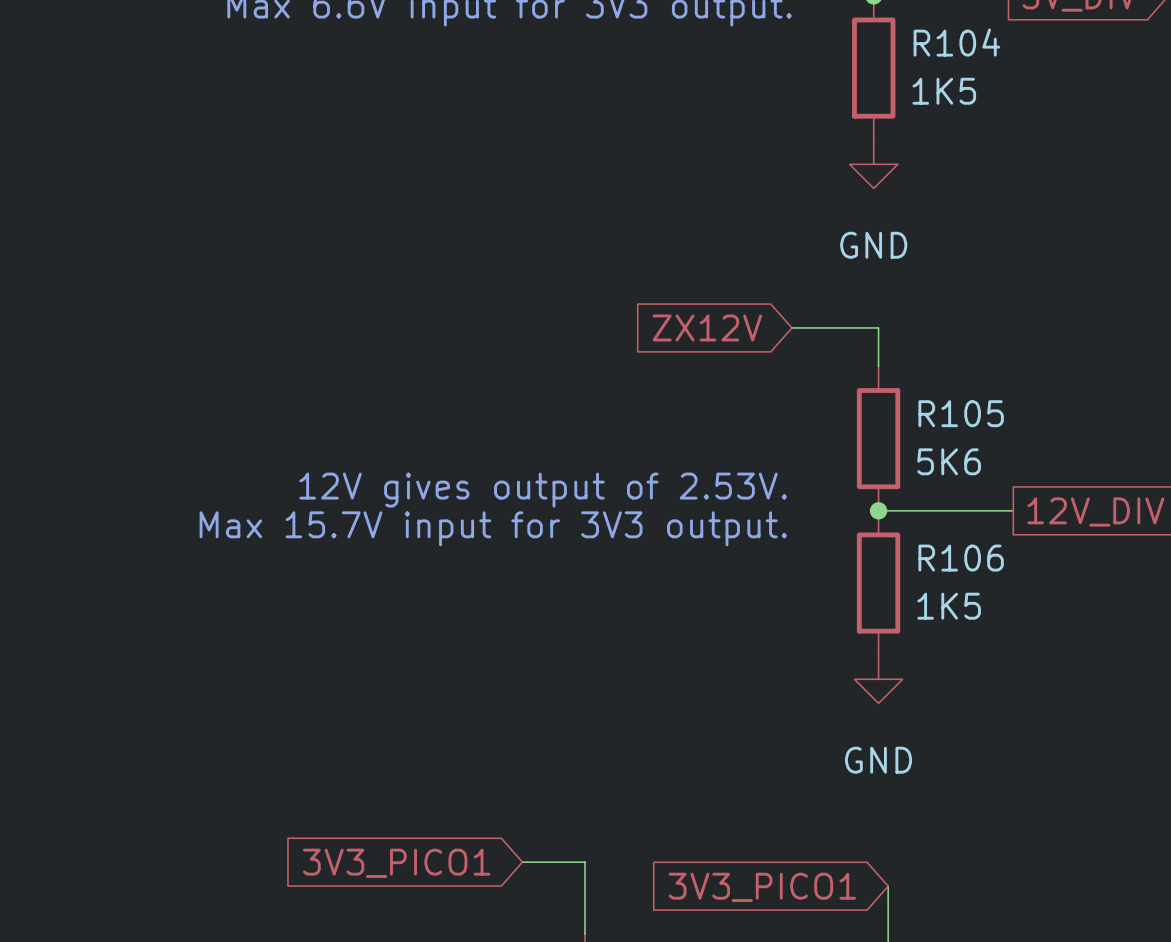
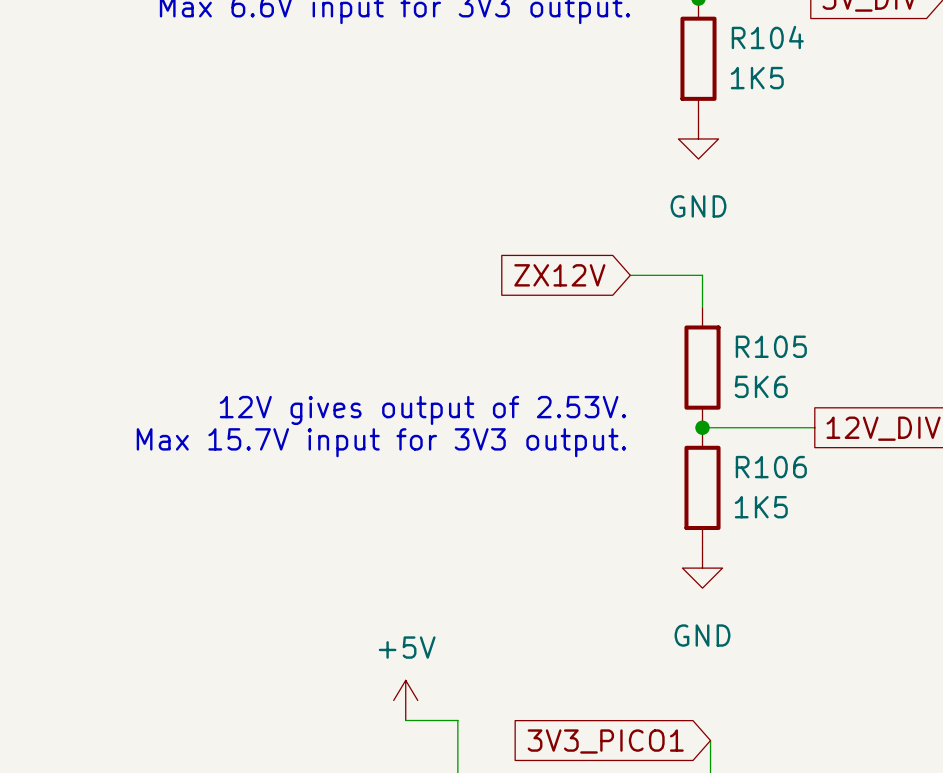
power symbol: none -> +5V (405, 700)
global label: 3V3_PICO1 (396, 863) -> none

